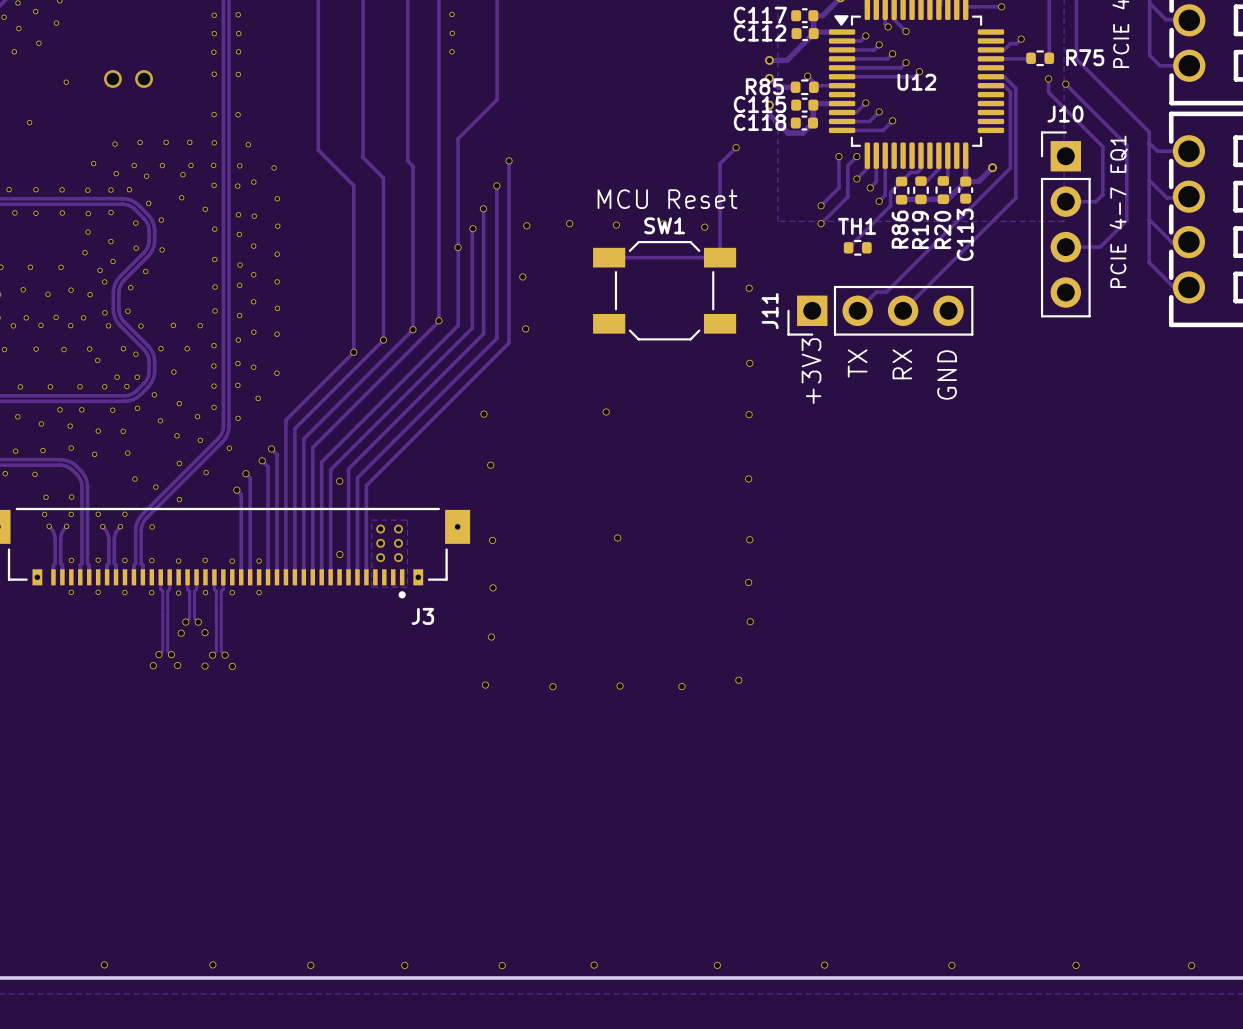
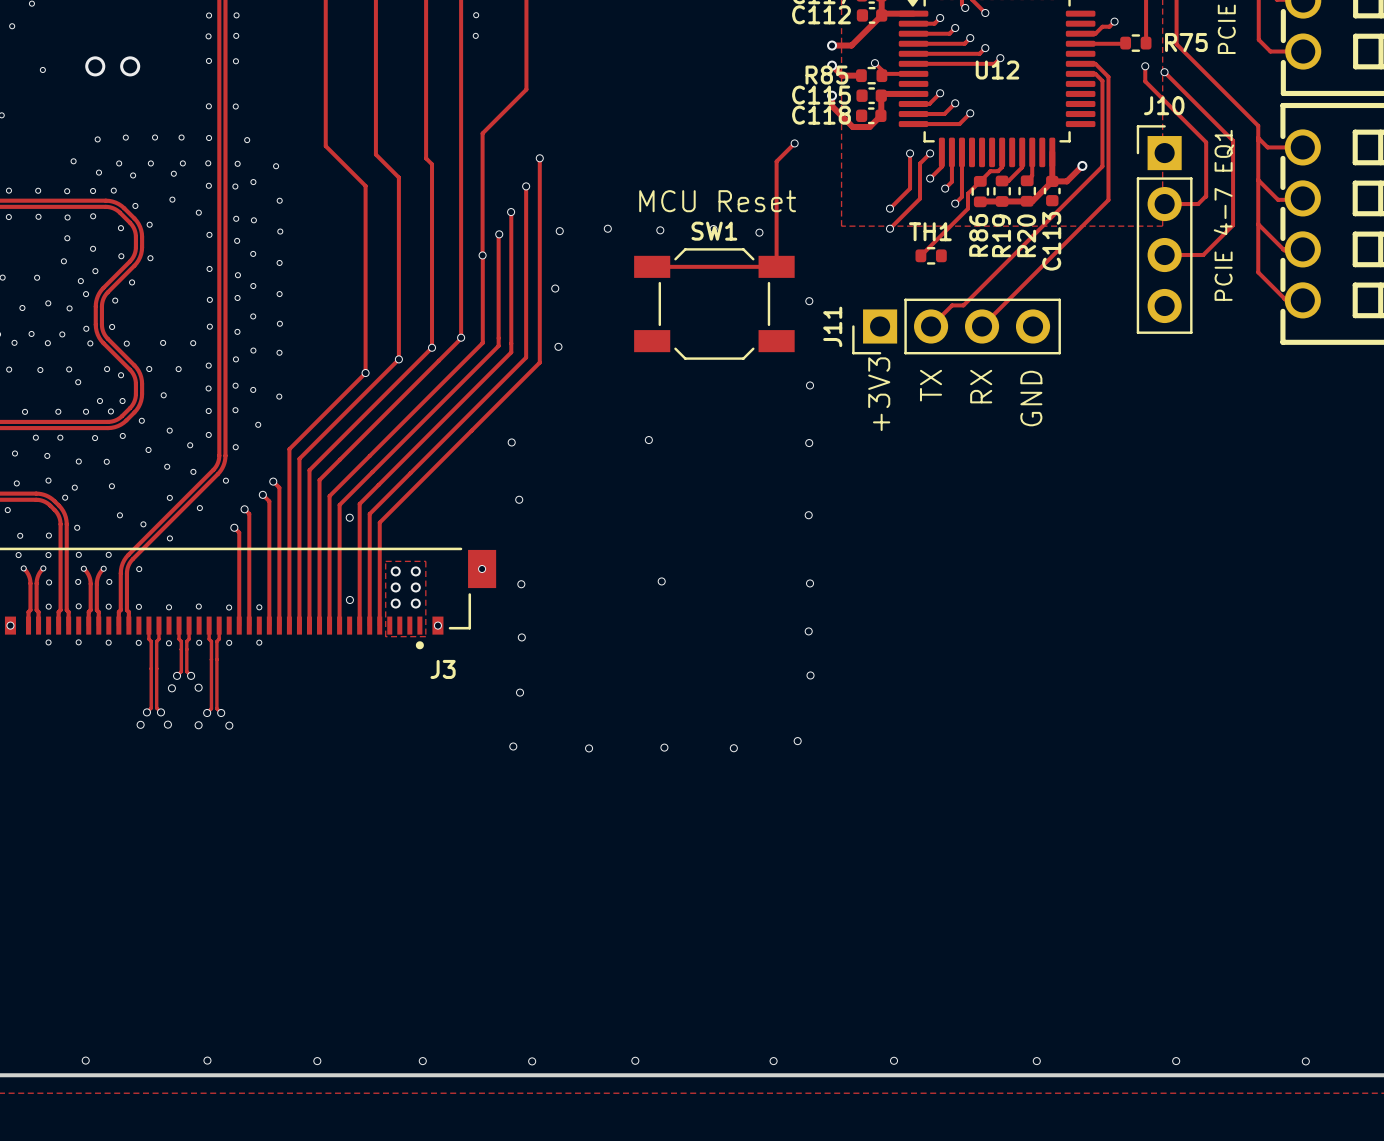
via: none -> (65, 497)
via: none -> (77, 527)
via: none -> (49, 582)
via: none -> (78, 581)
via: none -> (109, 581)

